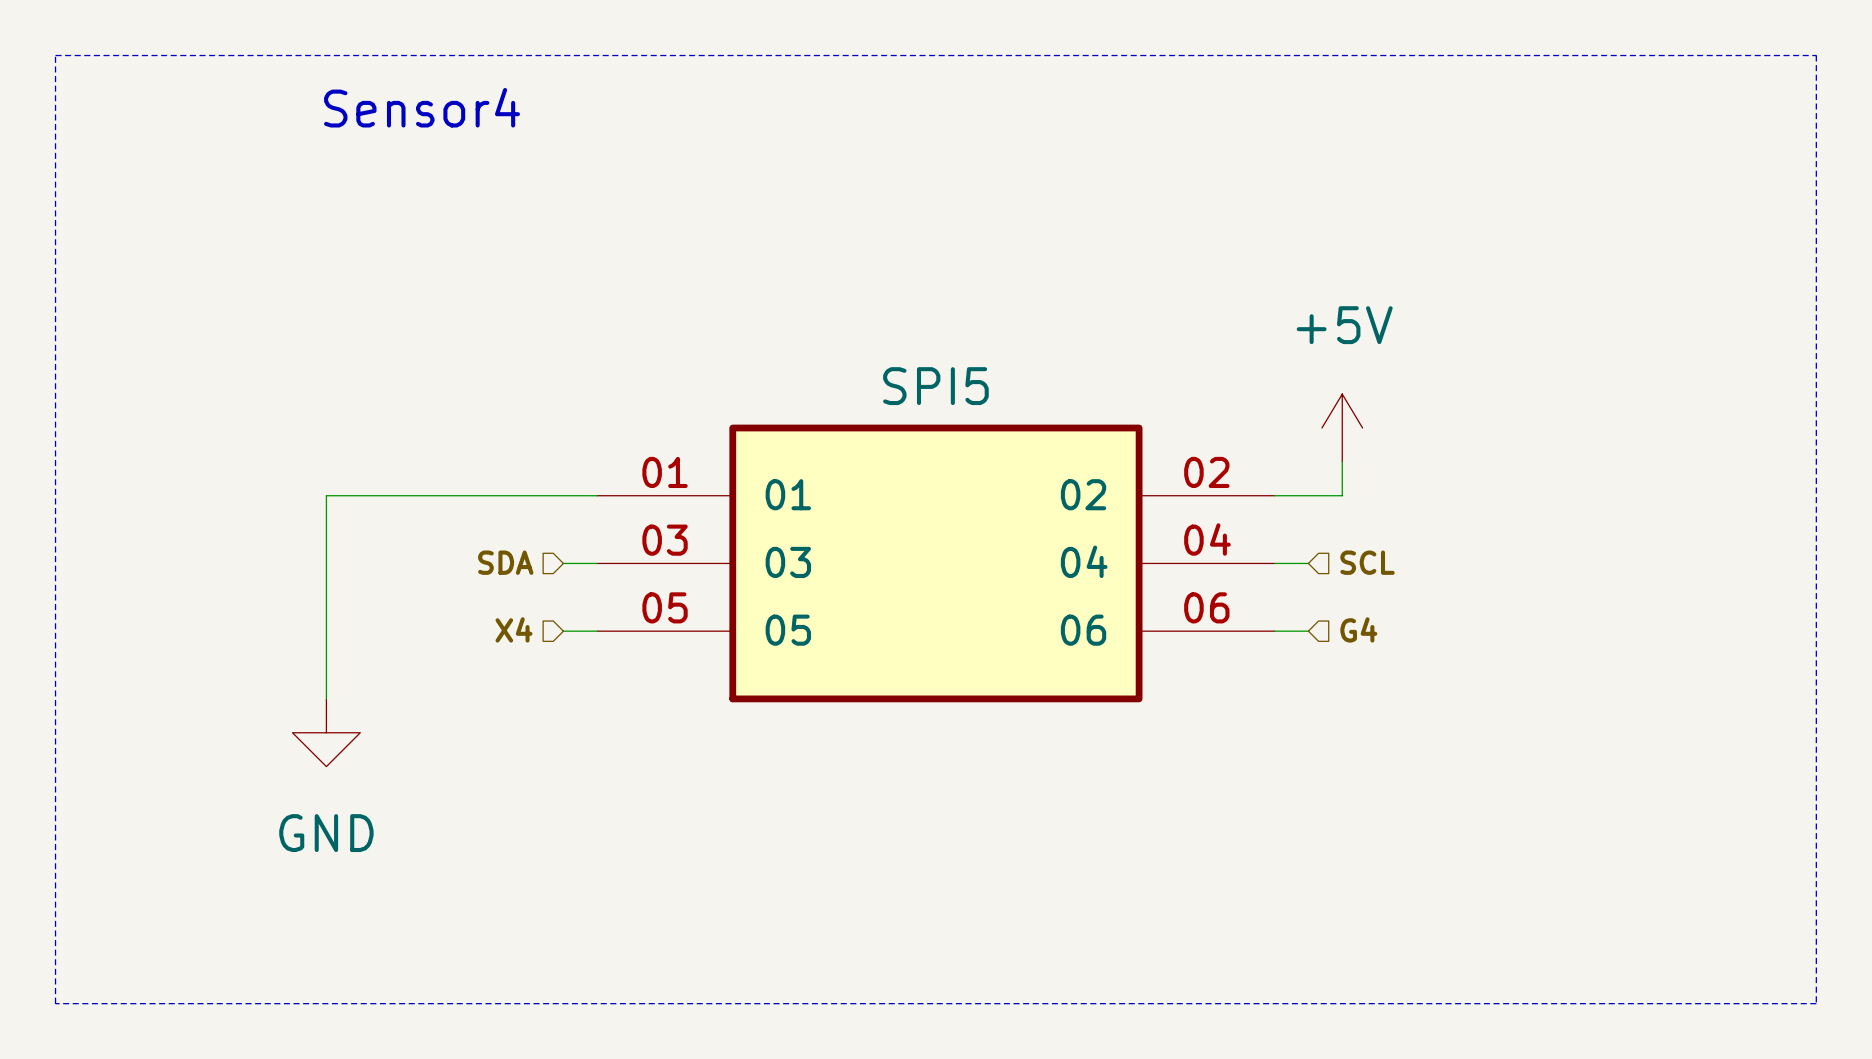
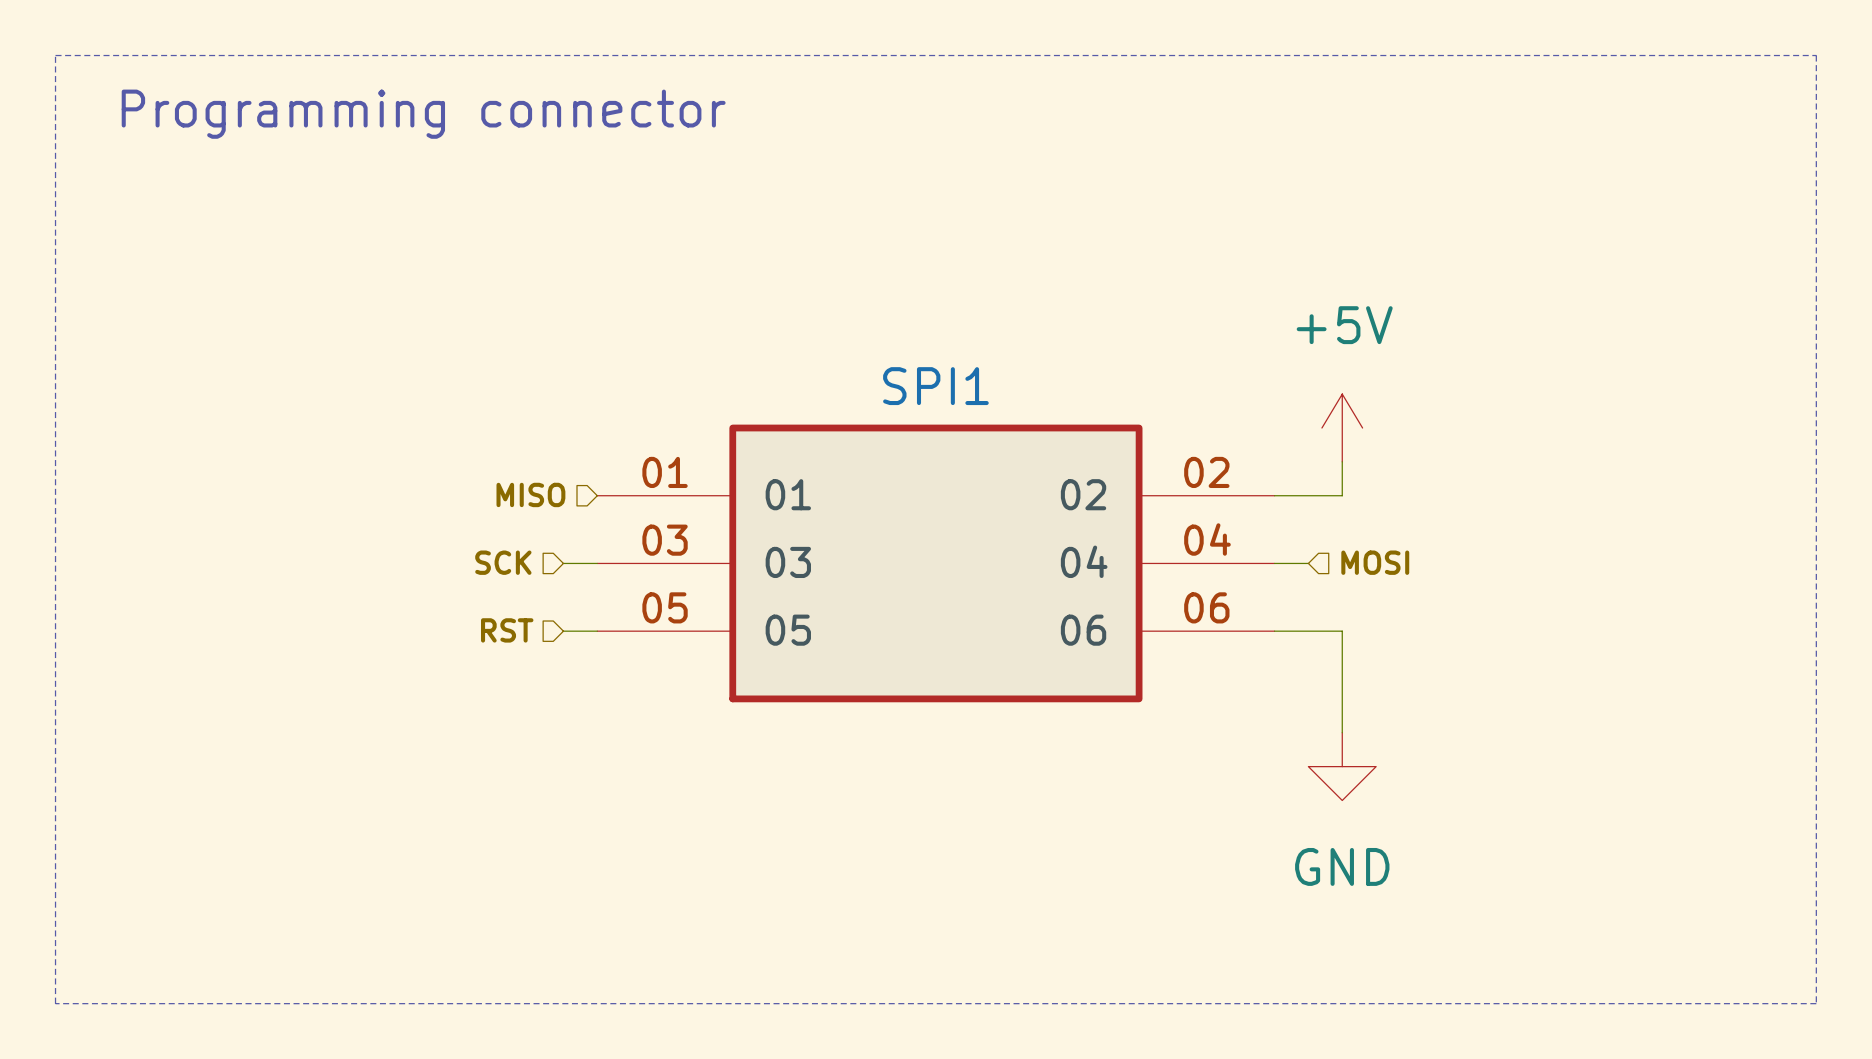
text: Sensor4 (422, 107) -> Programming connector (423, 114)
SPI5 name: SPI5 (935, 386) -> SPI1 (935, 386)
hierarchical label: none -> MISO (530, 494)
wire: (597, 495) (326, 495) (326, 698) -> none
hierarchical label: SDA (505, 562) -> SCK (503, 562)
hierarchical label: SCL (1367, 562) -> MOSI (1375, 562)
hierarchical label: X4 (514, 629) -> RST (507, 630)
hierarchical label: G4 (1358, 629) -> none
wire: none -> (1308, 631) (1342, 631) (1342, 732)
power symbol: GND (326, 732) -> none
power symbol: none -> GND (1342, 766)

